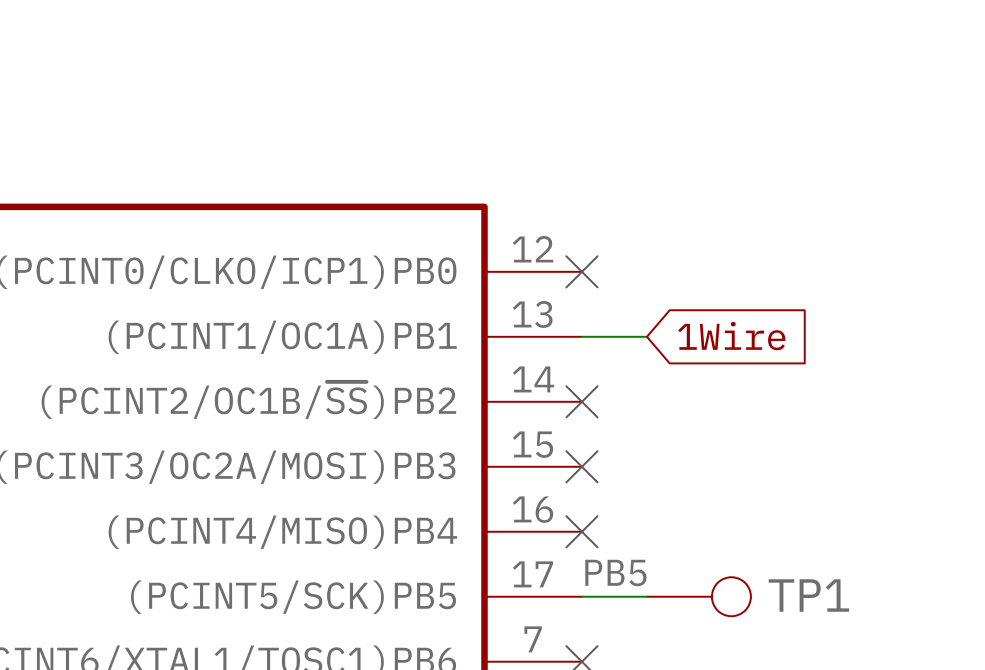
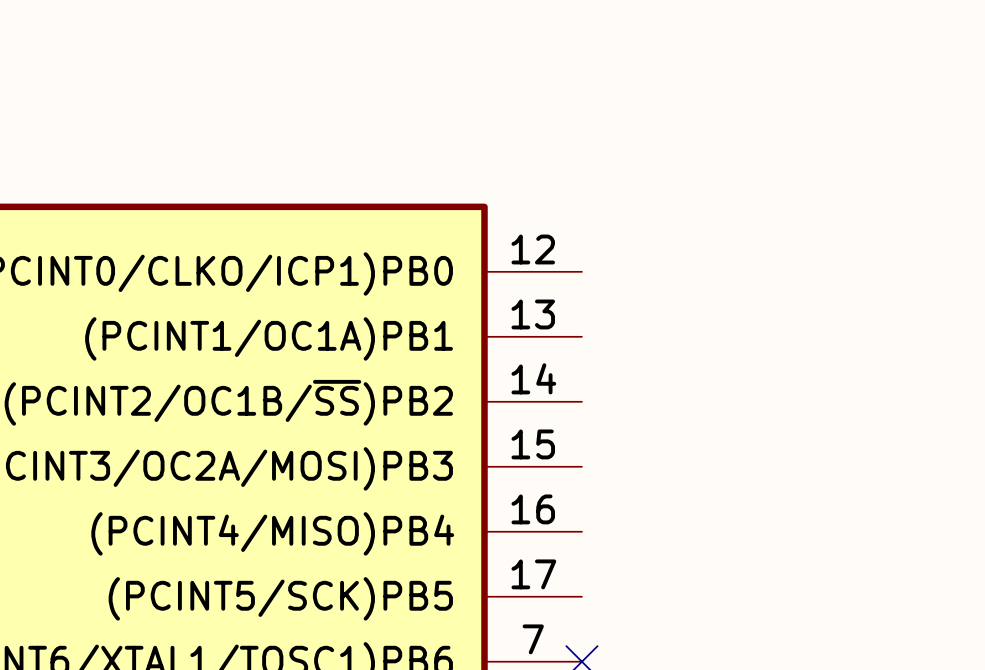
no-connect mark: (581, 271) -> none
wire: (581, 336) (646, 336) -> none
global label: 1Wire (731, 336) -> none
no-connect mark: (581, 401) -> none
no-connect mark: (581, 466) -> none
no-connect mark: (581, 531) -> none
label: PB5 (615, 572) -> none
wire: (581, 596) (646, 596) -> none
TP1: (698, 596) -> none

